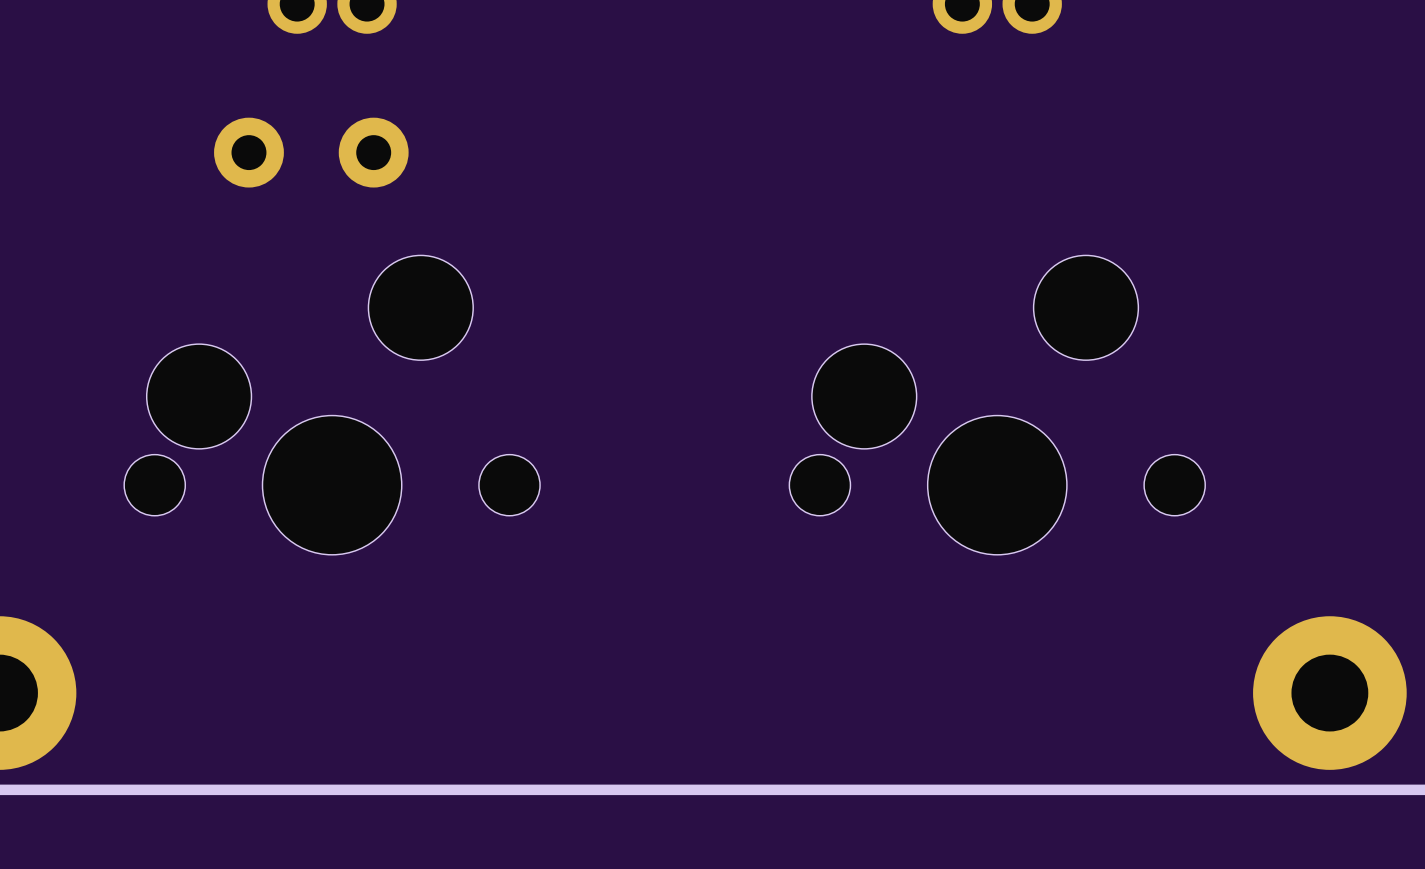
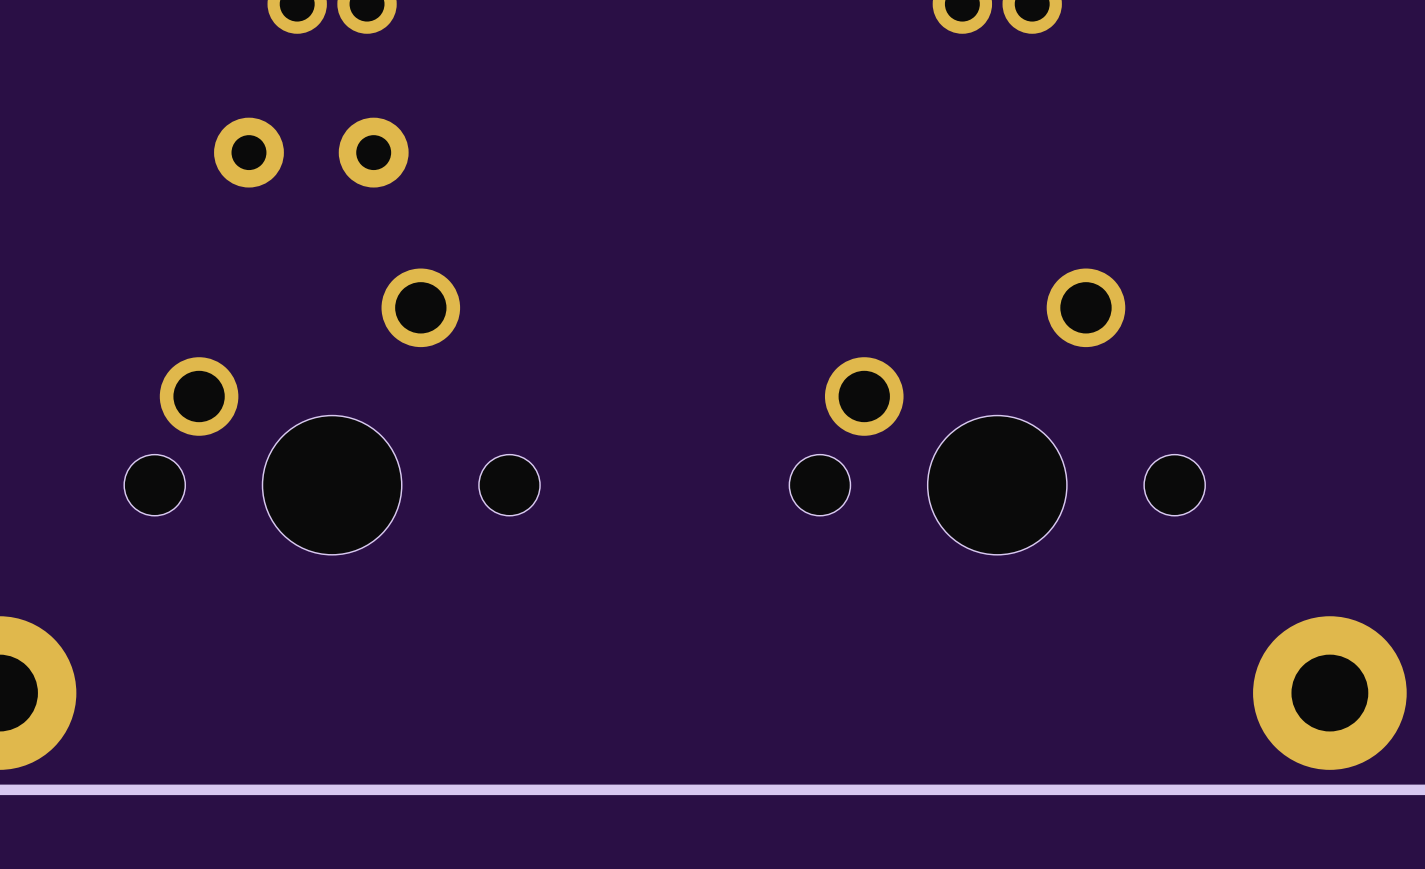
part footprint: [124, 255, 541, 555] -> [124, 268, 541, 555]
part footprint: [789, 255, 1206, 555] -> [789, 268, 1206, 555]

